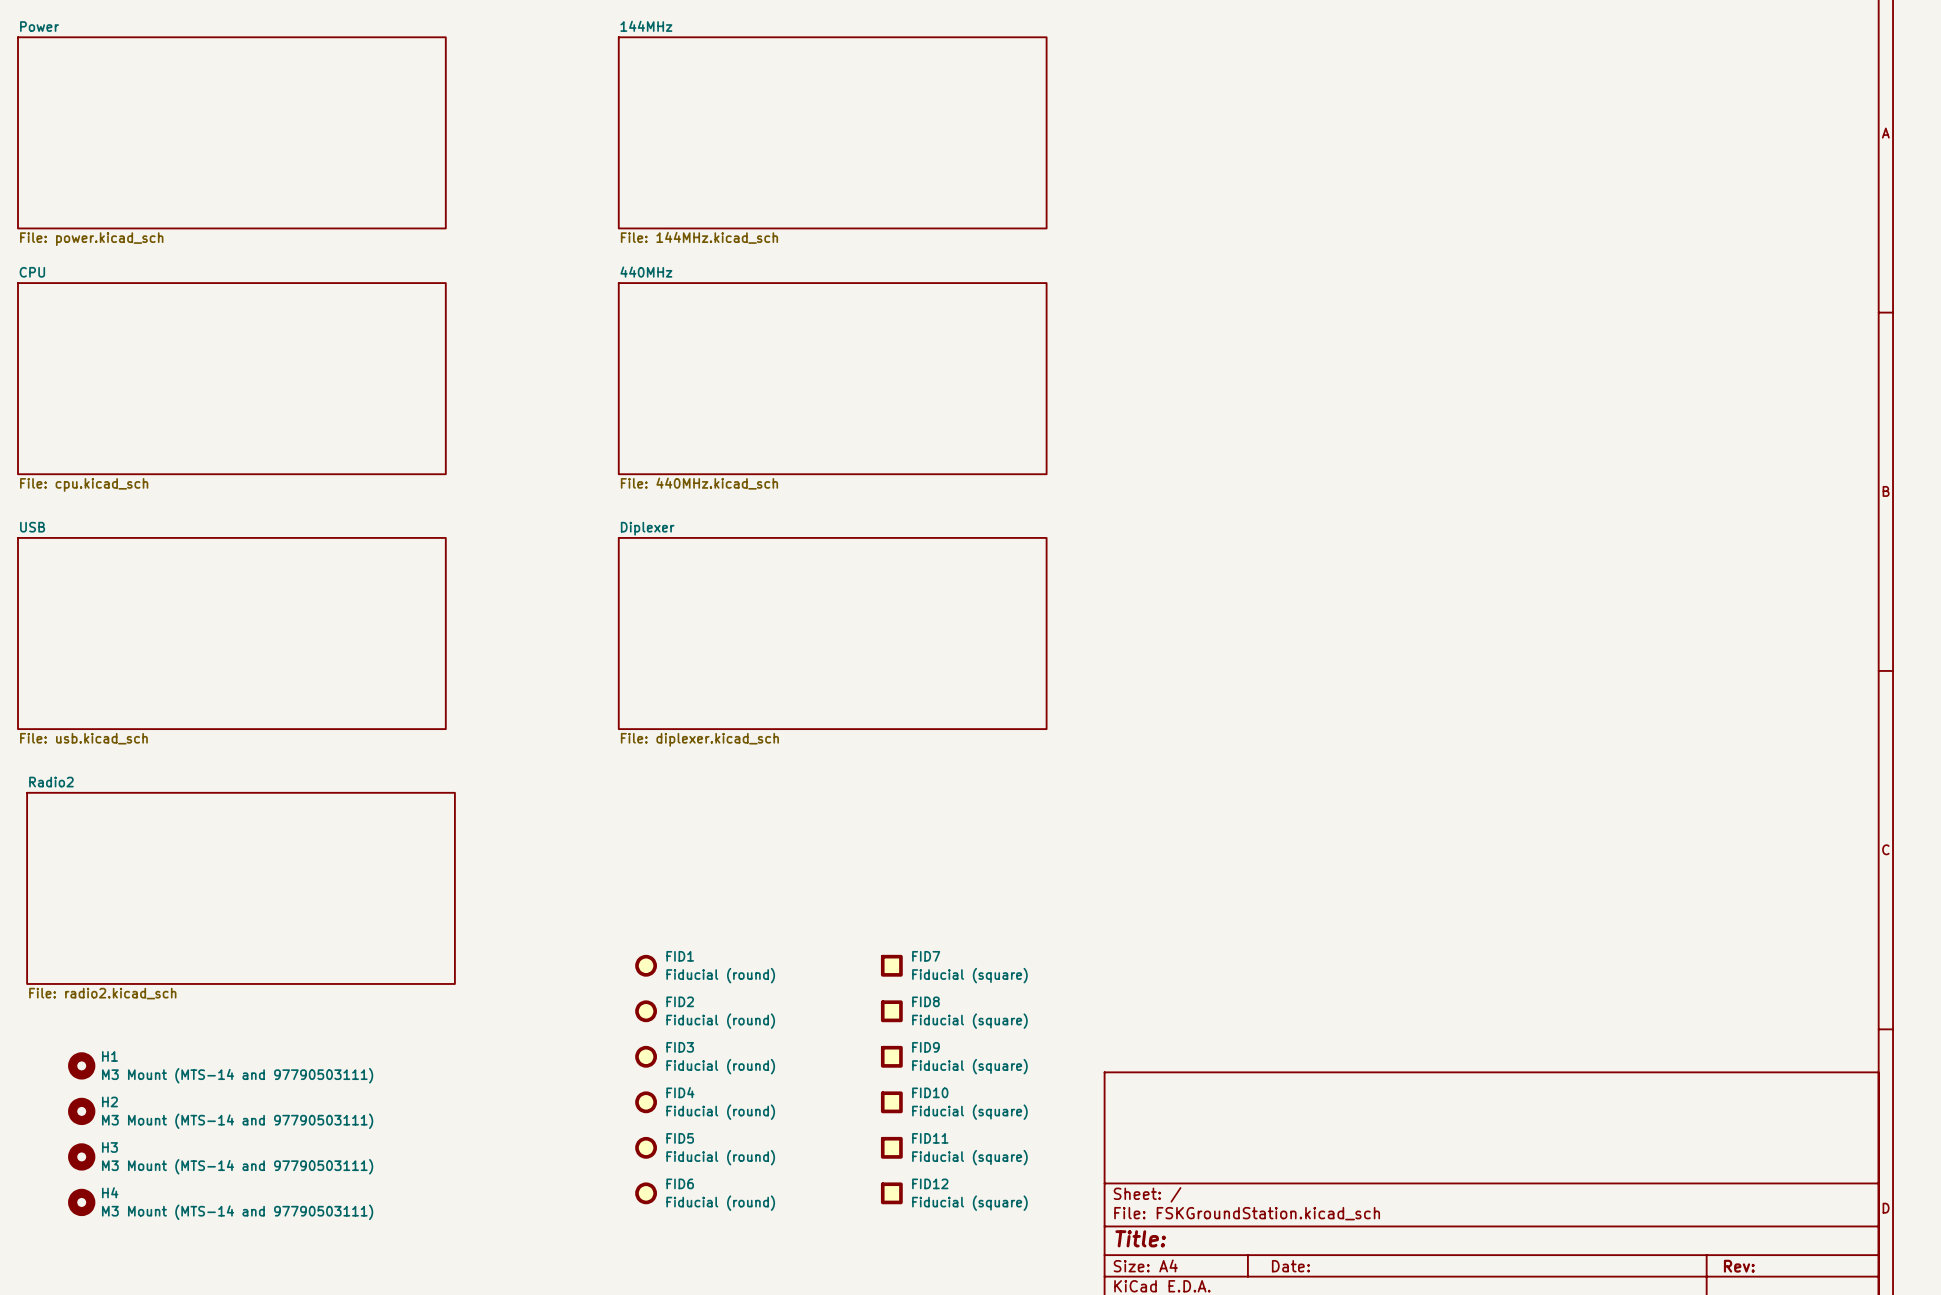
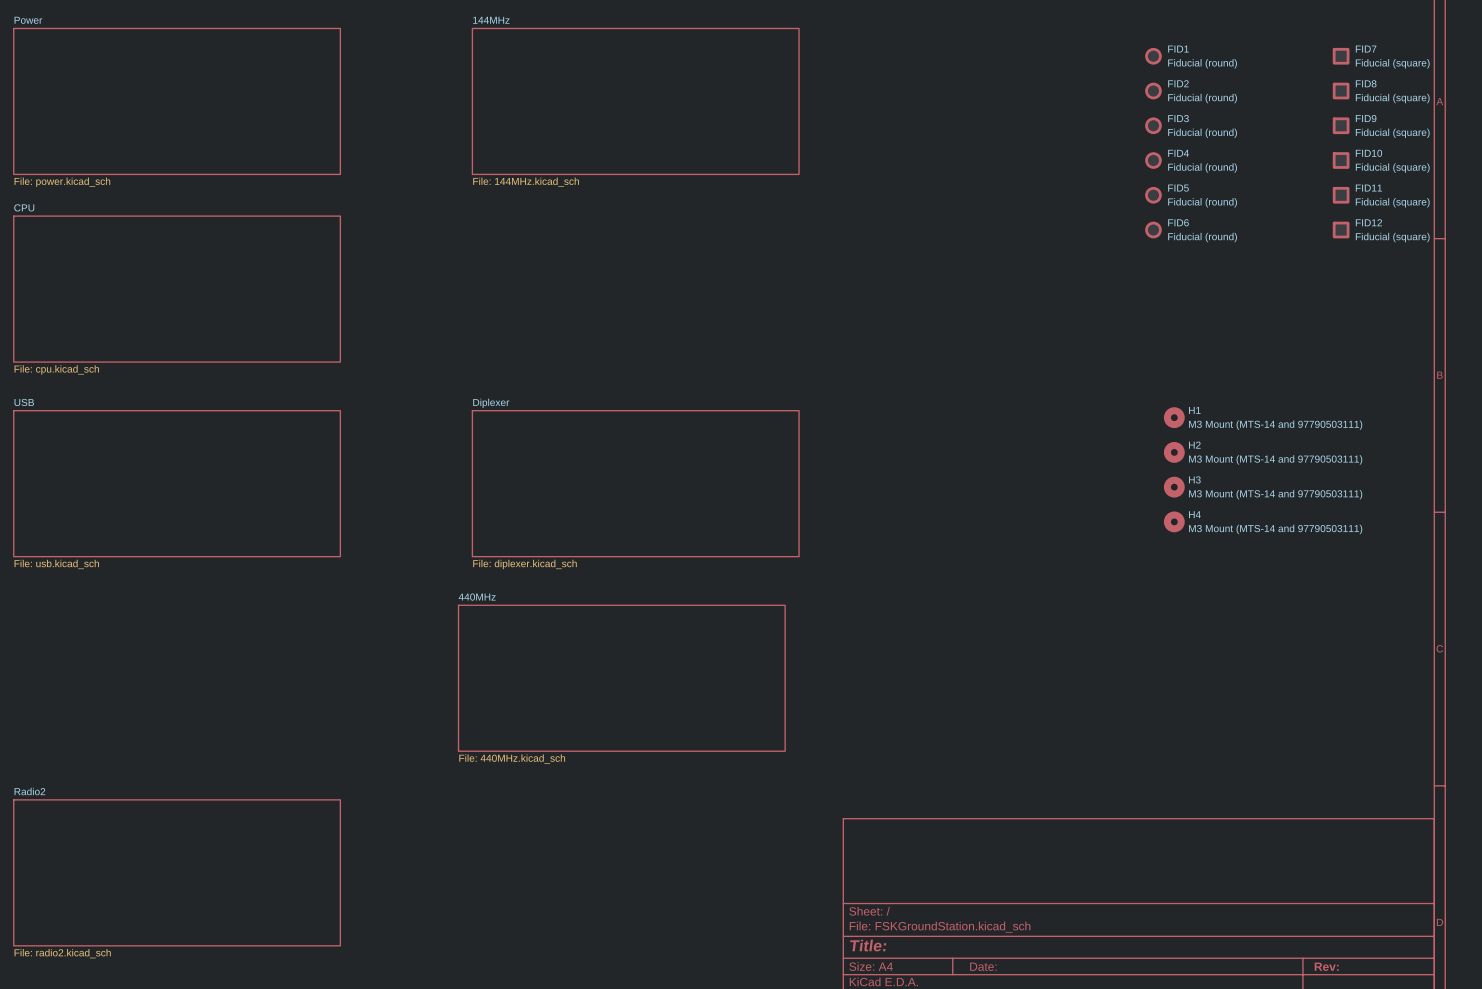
sheet 440MHz position: (832, 378) -> (621, 678)
sheet Radio2 position: (241, 888) -> (177, 872)
FID1 position: (646, 965) -> (1153, 56)
FID7 position: (891, 965) -> (1341, 56)
FID2 position: (646, 1011) -> (1153, 91)
FID8 position: (891, 1011) -> (1341, 91)
FID3 position: (646, 1056) -> (1153, 125)
FID9 position: (891, 1056) -> (1341, 125)
H1 position: (81, 1065) -> (1174, 417)
FID4 position: (646, 1102) -> (1153, 160)
FID10 position: (891, 1102) -> (1341, 160)
H2 position: (81, 1111) -> (1174, 452)
FID5 position: (646, 1147) -> (1153, 195)
FID11 position: (891, 1147) -> (1341, 195)
H3 position: (81, 1156) -> (1174, 487)
FID6 position: (646, 1193) -> (1153, 230)
FID12 position: (891, 1193) -> (1341, 230)
H4 position: (81, 1202) -> (1174, 521)

